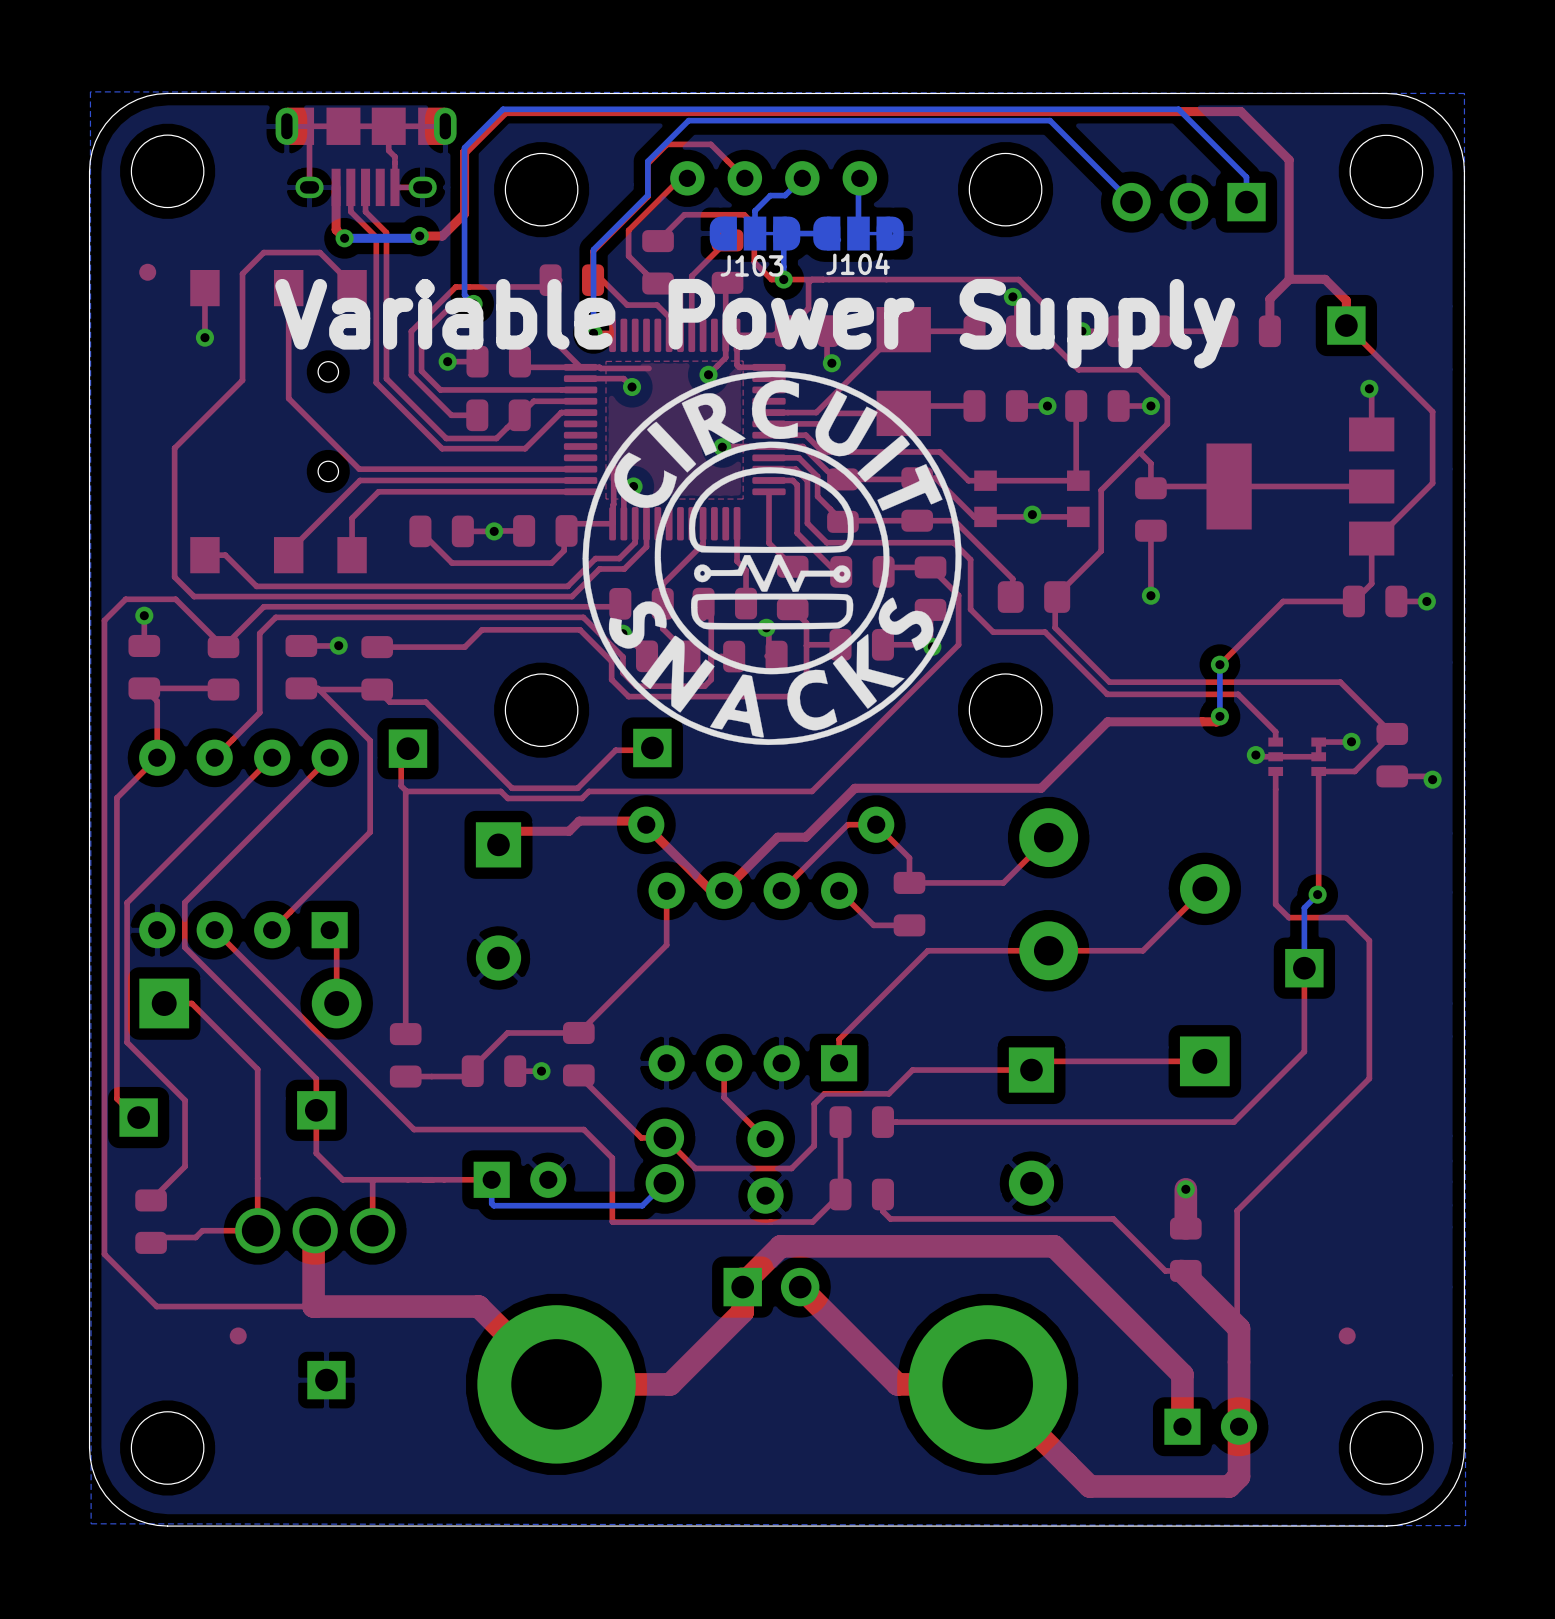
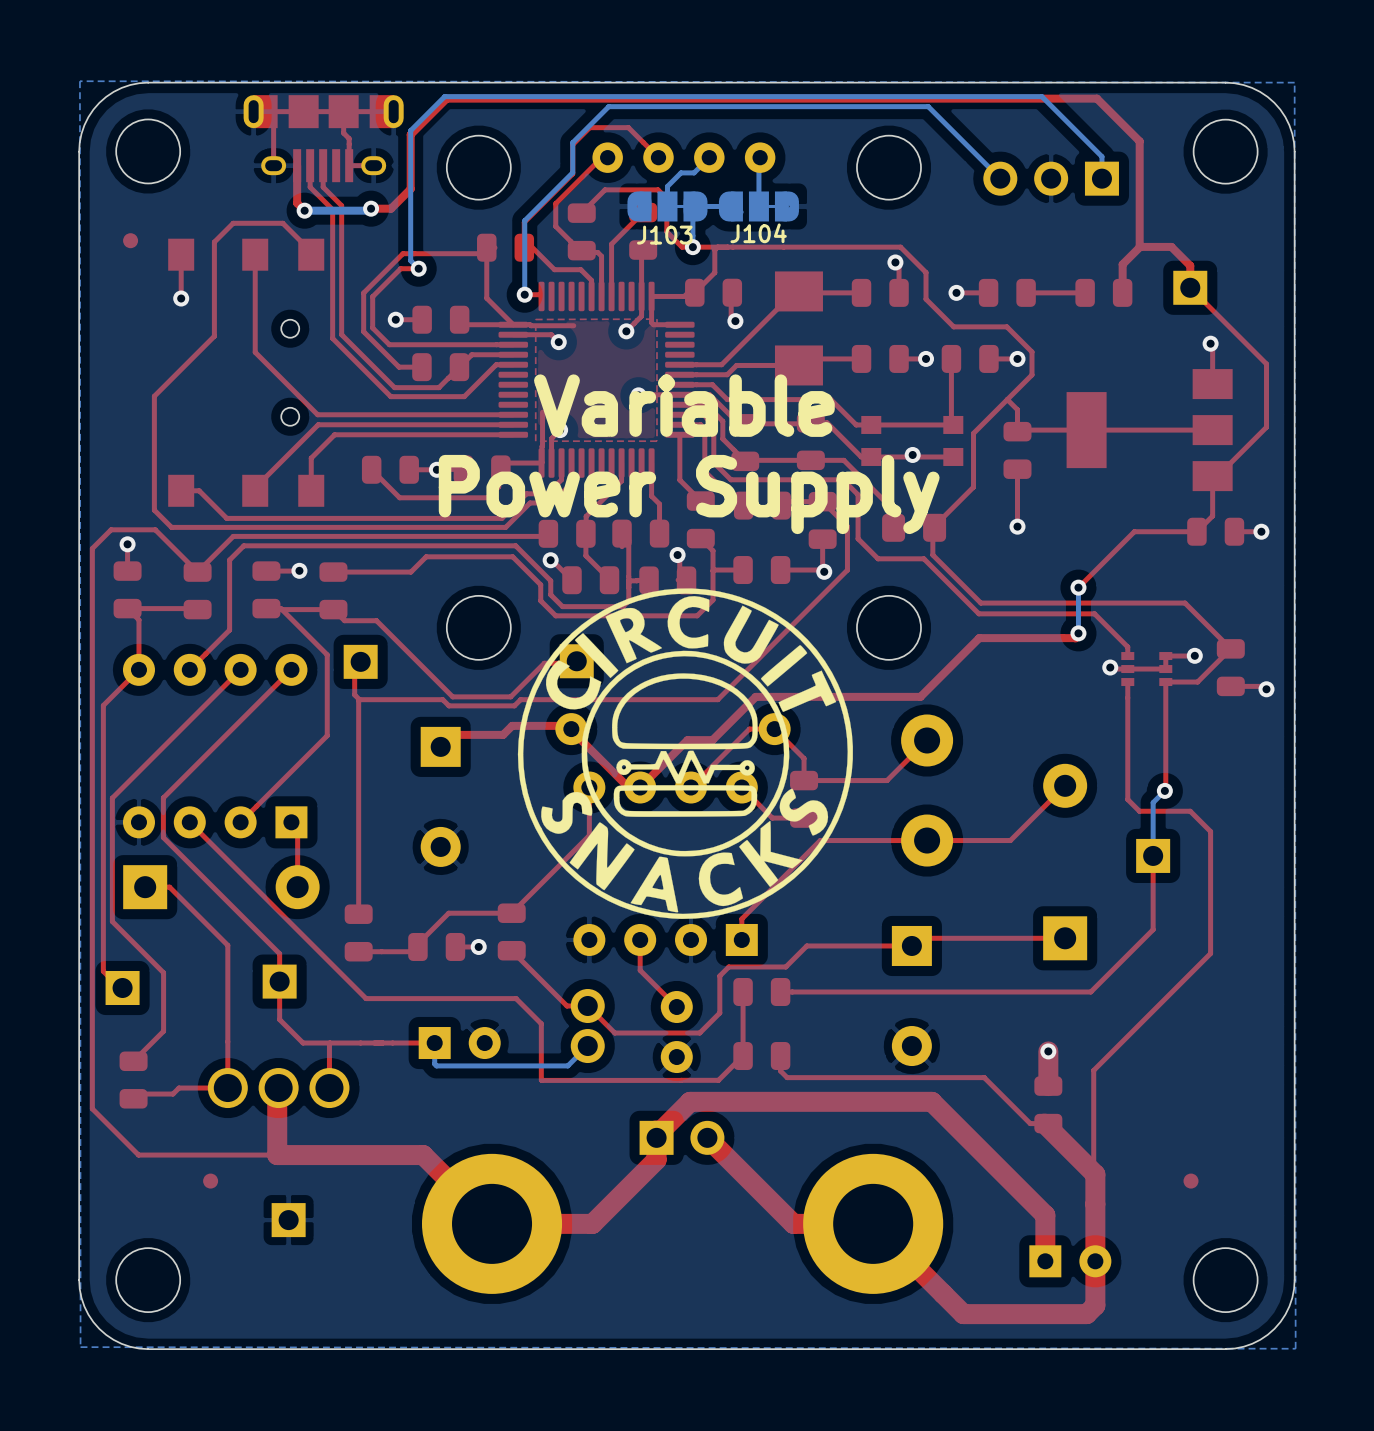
text: Variable Power Supply (755, 323) -> none
text: none -> Variable (684, 405)
drawing position: (772, 558) -> (685, 753)
text: none -> Power Supply (689, 494)

